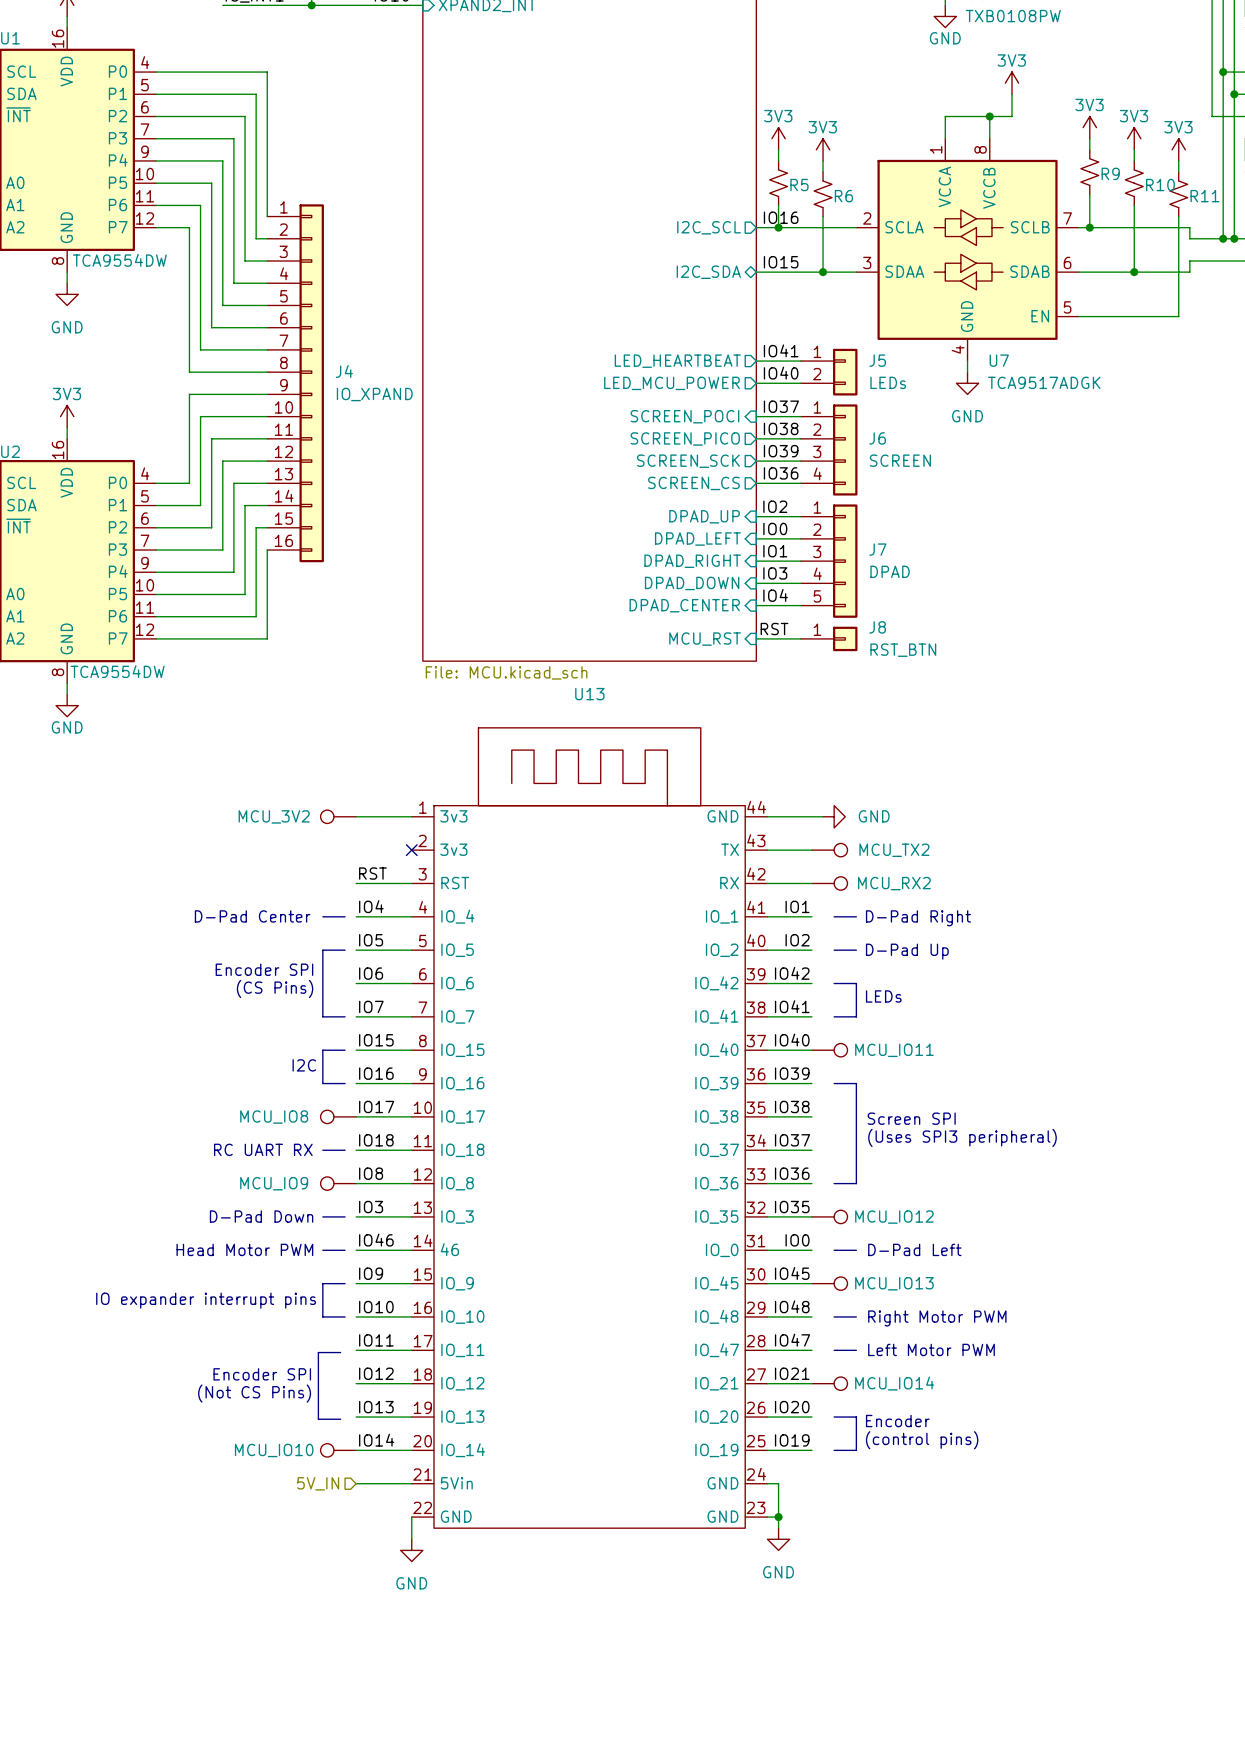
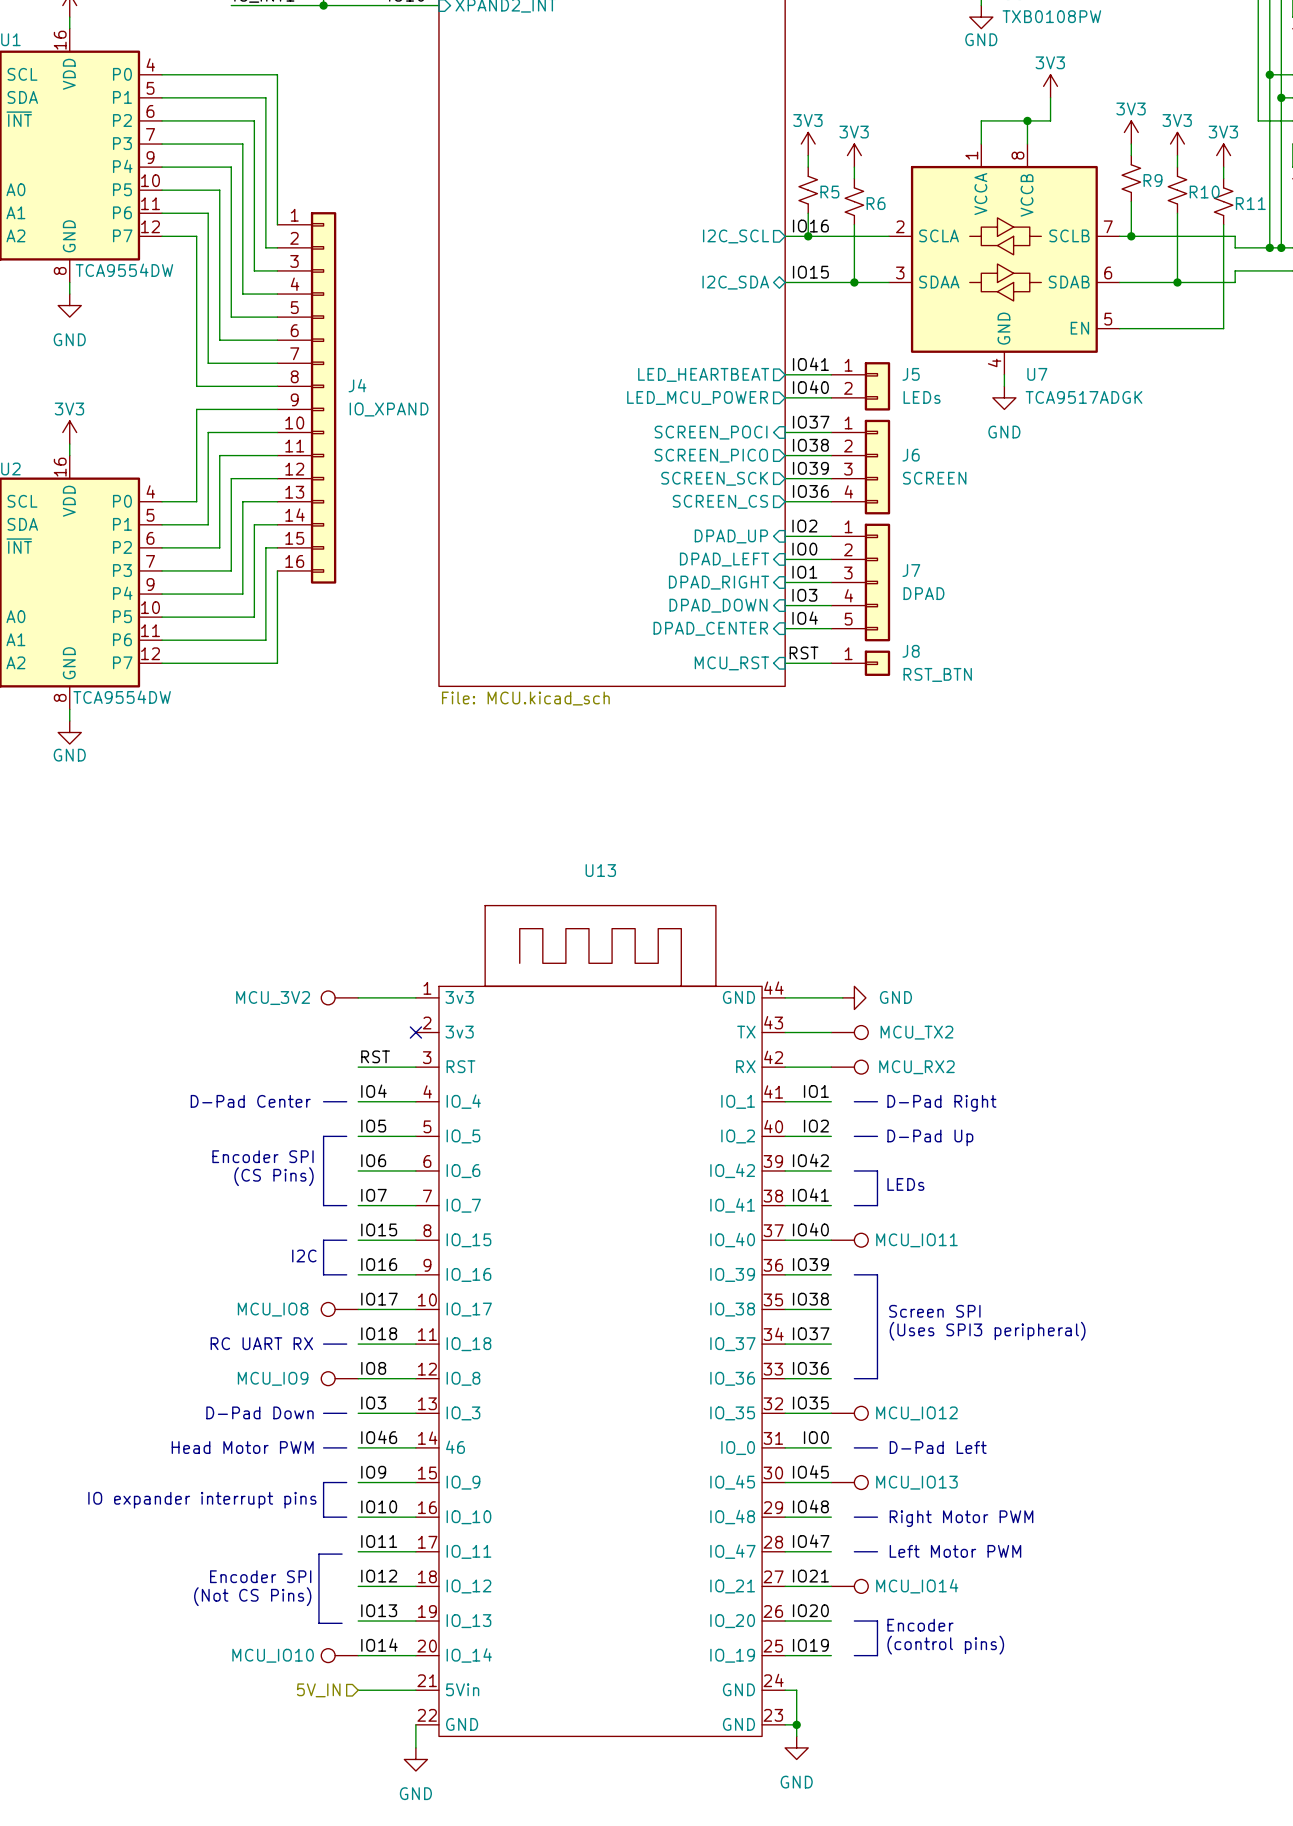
MCU_3V2 position: (338, 816) -> (339, 997)
wire: (356, 816) (411, 816) -> (358, 997) (415, 997)
wire: (767, 816) (823, 816) -> (785, 997) (842, 997)
power symbol position: GND (834, 816) -> GND (854, 997)
no-connect mark: (411, 850) -> none
wire: (767, 850) (811, 850) -> (785, 1032) (831, 1032)
MCU_TX2 position: (829, 850) -> (849, 1032)
label position: RST (372, 873) -> RST (375, 1056)
wire: (356, 883) (411, 883) -> (358, 1067) (415, 1067)
wire: (767, 883) (811, 883) -> (785, 1067) (831, 1067)
MCU_RX2 position: (829, 883) -> (849, 1067)
label position: IO4 (371, 906) -> IO4 (373, 1091)
label position: IO1 (797, 906) -> IO1 (816, 1091)
text position: D-Pad Center (252, 916) -> D-Pad Center (250, 1101)
line: (322, 916) (345, 916) -> (323, 1101) (346, 1101)
wire: (356, 916) (411, 916) -> (358, 1101) (415, 1101)
wire: (767, 916) (811, 916) -> (785, 1101) (831, 1101)
line: (834, 916) (856, 916) -> (854, 1101) (877, 1101)
text position: D-Pad Right (918, 918) -> D-Pad Right (941, 1103)
label position: IO5 (371, 940) -> IO5 (373, 1126)
label position: IO2 (797, 940) -> IO2 (816, 1126)
line: (345, 950) (322, 950) (322, 1016) (345, 1016) -> (346, 1136) (323, 1136) (323, 1205) (346, 1205)
wire: (356, 950) (411, 950) -> (358, 1136) (415, 1136)
wire: (767, 950) (811, 950) -> (785, 1136) (831, 1136)
line: (834, 950) (856, 950) -> (854, 1136) (877, 1136)
text position: D-Pad Up (907, 951) -> D-Pad Up (930, 1137)
text: Encoder SPI (264, 969) -> none
label position: IO6 (371, 973) -> IO6 (373, 1160)
label position: IO42 (792, 973) -> IO42 (810, 1160)
wire: (356, 983) (411, 983) -> (358, 1170) (415, 1170)
wire: (767, 983) (811, 983) -> (785, 1170) (831, 1170)
line: (834, 983) (856, 983) (856, 1016) (834, 1016) -> (854, 1170) (877, 1170) (877, 1205) (854, 1205)
text position: (CS Pins) (275, 988) -> (CS Pins) (273, 1176)
no-connect mark: none -> (415, 1032)
text position: LEDs (883, 996) -> LEDs (905, 1184)
label position: IO7 (371, 1006) -> IO7 (373, 1195)
label position: IO41 (792, 1006) -> IO41 (810, 1195)
wire: (356, 1016) (411, 1016) -> (358, 1205) (415, 1205)
wire: (767, 1016) (811, 1016) -> (785, 1205) (831, 1205)
label position: IO15 (376, 1040) -> IO15 (379, 1229)
label position: IO40 (792, 1040) -> IO40 (810, 1229)
line: (345, 1050) (322, 1050) (322, 1083) (345, 1083) -> (346, 1240) (323, 1240) (323, 1274) (346, 1274)
wire: (356, 1050) (411, 1050) -> (358, 1240) (415, 1240)
wire: (767, 1050) (811, 1050) -> (785, 1240) (831, 1240)
MCU_IO11 position: (829, 1050) -> (849, 1240)
text position: I2C (304, 1065) -> I2C (304, 1255)
label position: IO16 (376, 1073) -> IO16 (379, 1264)
label position: IO39 (792, 1073) -> IO39 (810, 1264)
wire: (356, 1083) (411, 1083) -> (358, 1274) (415, 1274)
wire: (767, 1083) (811, 1083) -> (785, 1274) (831, 1274)
line: (834, 1083) (856, 1083) (856, 1183) (834, 1183) -> (854, 1274) (877, 1274) (877, 1378) (854, 1378)
label position: IO17 (376, 1106) -> IO17 (379, 1299)
label position: IO38 (792, 1106) -> IO38 (810, 1299)
text: none -> Encoder SPI (263, 1156)
MCU_IO8 position: (338, 1116) -> (339, 1309)
wire: (356, 1116) (411, 1116) -> (358, 1309) (415, 1309)
wire: (767, 1116) (811, 1116) -> (785, 1309) (831, 1309)
text position: Screen SPI (911, 1118) -> Screen SPI (934, 1311)
U13 position: (589, 1128) -> (600, 1320)
text position: (Uses SPI3 peripheral) (962, 1137) -> (Uses SPI3 peripheral) (987, 1331)
label position: IO18 (376, 1140) -> IO18 (379, 1333)
label position: IO37 (792, 1140) -> IO37 (811, 1333)
text position: RC UART RX (263, 1149) -> RC UART RX (261, 1343)
line: (322, 1150) (345, 1150) -> (323, 1344) (346, 1344)
wire: (356, 1150) (411, 1150) -> (358, 1344) (415, 1344)
wire: (767, 1150) (811, 1150) -> (785, 1344) (831, 1344)
label position: IO8 (371, 1173) -> IO8 (373, 1368)
label position: IO36 (792, 1173) -> IO36 (810, 1368)
MCU_IO9 position: (338, 1183) -> (339, 1378)
wire: (356, 1183) (411, 1183) -> (358, 1378) (415, 1378)
wire: (767, 1183) (811, 1183) -> (785, 1378) (831, 1378)
label position: IO3 (371, 1207) -> IO3 (373, 1403)
label position: IO35 (792, 1207) -> IO35 (810, 1403)
text position: D-Pad Down (261, 1216) -> D-Pad Down (259, 1412)
line: (322, 1216) (345, 1216) -> (323, 1413) (346, 1413)
wire: (356, 1216) (411, 1216) -> (358, 1413) (415, 1413)
wire: (767, 1216) (811, 1216) -> (785, 1413) (831, 1413)
MCU_IO12 position: (829, 1216) -> (849, 1413)
label position: IO46 (376, 1240) -> IO46 (379, 1437)
label position: IO0 (797, 1240) -> IO0 (816, 1437)
text position: Head Motor PWM (244, 1249) -> Head Motor PWM (242, 1447)
text position: D-Pad Left (914, 1249) -> D-Pad Left (938, 1447)
line: (322, 1250) (345, 1250) -> (323, 1447) (346, 1447)
wire: (356, 1250) (411, 1250) -> (358, 1447) (415, 1447)
wire: (767, 1250) (811, 1250) -> (785, 1447) (831, 1447)
line: (834, 1250) (856, 1250) -> (854, 1447) (877, 1447)
label position: IO9 (371, 1273) -> IO9 (373, 1472)
label position: IO45 (792, 1273) -> IO45 (810, 1471)
line: (345, 1283) (322, 1283) (322, 1316) (345, 1316) -> (346, 1482) (323, 1482) (323, 1517) (346, 1517)
wire: (356, 1283) (411, 1283) -> (358, 1482) (415, 1482)
wire: (767, 1283) (811, 1283) -> (785, 1482) (831, 1482)
MCU_IO13 position: (829, 1283) -> (849, 1482)
text position: IO expander interrupt pins (206, 1300) -> IO expander interrupt pins (202, 1500)
label position: IO48 (792, 1306) -> IO48 (810, 1506)
label position: IO10 (376, 1307) -> IO10 (379, 1506)
wire: (356, 1316) (411, 1316) -> (358, 1517) (415, 1517)
wire: (767, 1316) (811, 1316) -> (785, 1517) (831, 1517)
line: (834, 1316) (856, 1316) -> (854, 1517) (877, 1517)
text position: Right Motor PWM (937, 1318) -> Right Motor PWM (961, 1518)
label position: IO11 (376, 1340) -> IO11 (379, 1541)
label position: IO47 (792, 1340) -> IO47 (811, 1541)
text position: Left Motor PWM (931, 1349) -> Left Motor PWM (955, 1551)
wire: (356, 1350) (411, 1350) -> (358, 1551) (415, 1551)
wire: (767, 1350) (811, 1350) -> (785, 1551) (831, 1551)
line: (834, 1350) (856, 1350) -> (854, 1551) (877, 1551)
line: (340, 1352) (318, 1352) (318, 1419) (340, 1419) -> (342, 1554) (318, 1554) (318, 1623) (342, 1623)
label position: IO12 (376, 1373) -> IO12 (379, 1576)
label position: IO21 (792, 1373) -> IO21 (810, 1576)
text: Encoder SPI (262, 1374) -> none
wire: (356, 1383) (411, 1383) -> (358, 1586) (415, 1586)
wire: (767, 1383) (811, 1383) -> (785, 1586) (831, 1586)
MCU_IO14 position: (829, 1383) -> (849, 1586)
text position: (Not CS Pins) (254, 1393) -> (Not CS Pins) (252, 1596)
label position: IO13 (376, 1407) -> IO13 (379, 1610)
label position: IO20 (792, 1407) -> IO20 (810, 1610)
wire: (356, 1417) (411, 1417) -> (358, 1621) (415, 1621)
wire: (767, 1417) (811, 1417) -> (785, 1621) (831, 1621)
line: (834, 1417) (856, 1417) (856, 1450) (834, 1450) -> (854, 1621) (877, 1621) (877, 1655) (854, 1655)
text position: Encoder (897, 1421) -> Encoder (920, 1625)
label position: IO14 (376, 1440) -> IO14 (379, 1645)
label position: IO19 (792, 1440) -> IO19 (810, 1645)
text position: (control pins) (922, 1440) -> (control pins) (945, 1645)
MCU_IO10 position: (338, 1450) -> (339, 1655)
wire: (356, 1450) (411, 1450) -> (358, 1655) (415, 1655)
wire: (767, 1450) (811, 1450) -> (785, 1655) (831, 1655)
hierarchical label position: 5V_IN (318, 1483) -> 5V_IN (318, 1690)
wire: (356, 1483) (411, 1483) -> (358, 1690) (415, 1690)
wire: (767, 1483) (778, 1483) (778, 1528) -> (785, 1690) (796, 1690) (796, 1736)
wire: (411, 1517) (411, 1539) -> (415, 1724) (415, 1747)
wire: (767, 1517) (778, 1517) -> (785, 1724) (796, 1724)
junction: (778, 1517) -> none
text: none -> Encoder SPI (260, 1576)
power symbol position: GND (778, 1539) -> GND (796, 1747)
power symbol position: GND (411, 1550) -> GND (415, 1759)
junction: none -> (796, 1724)

